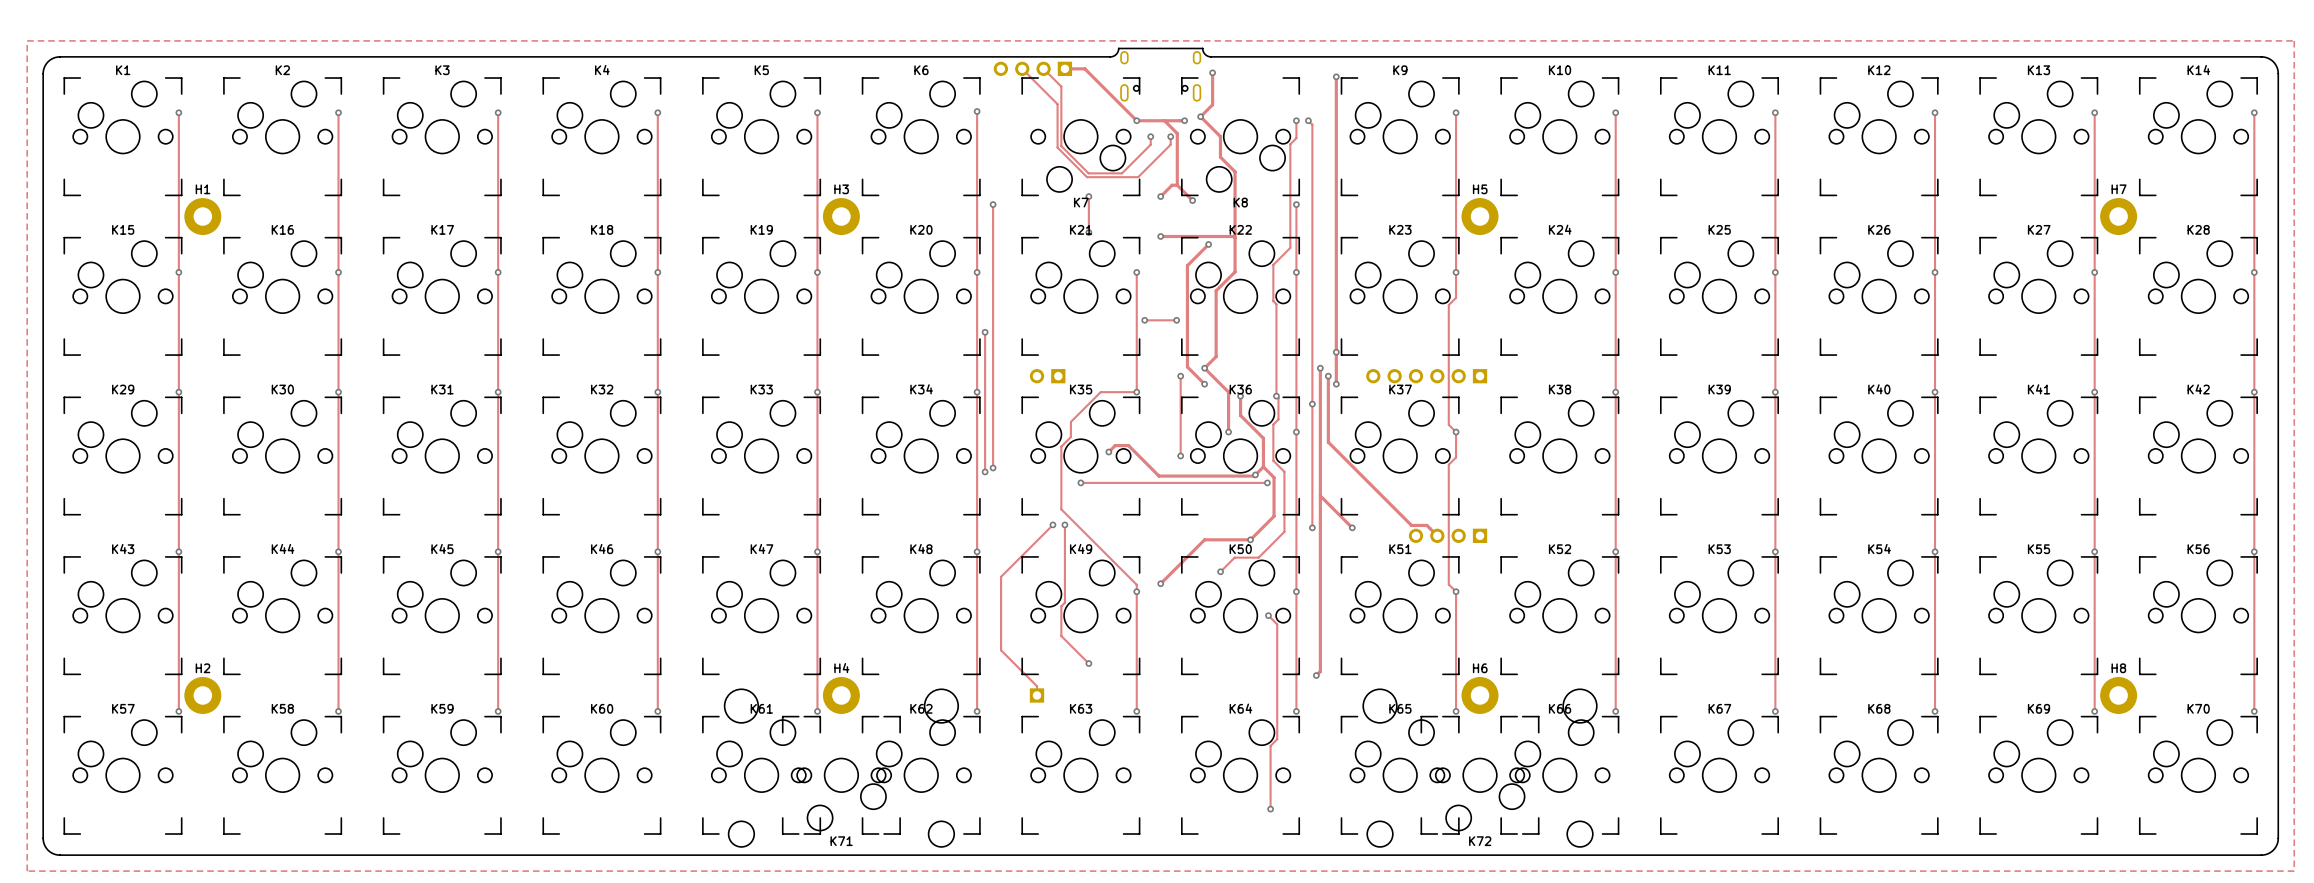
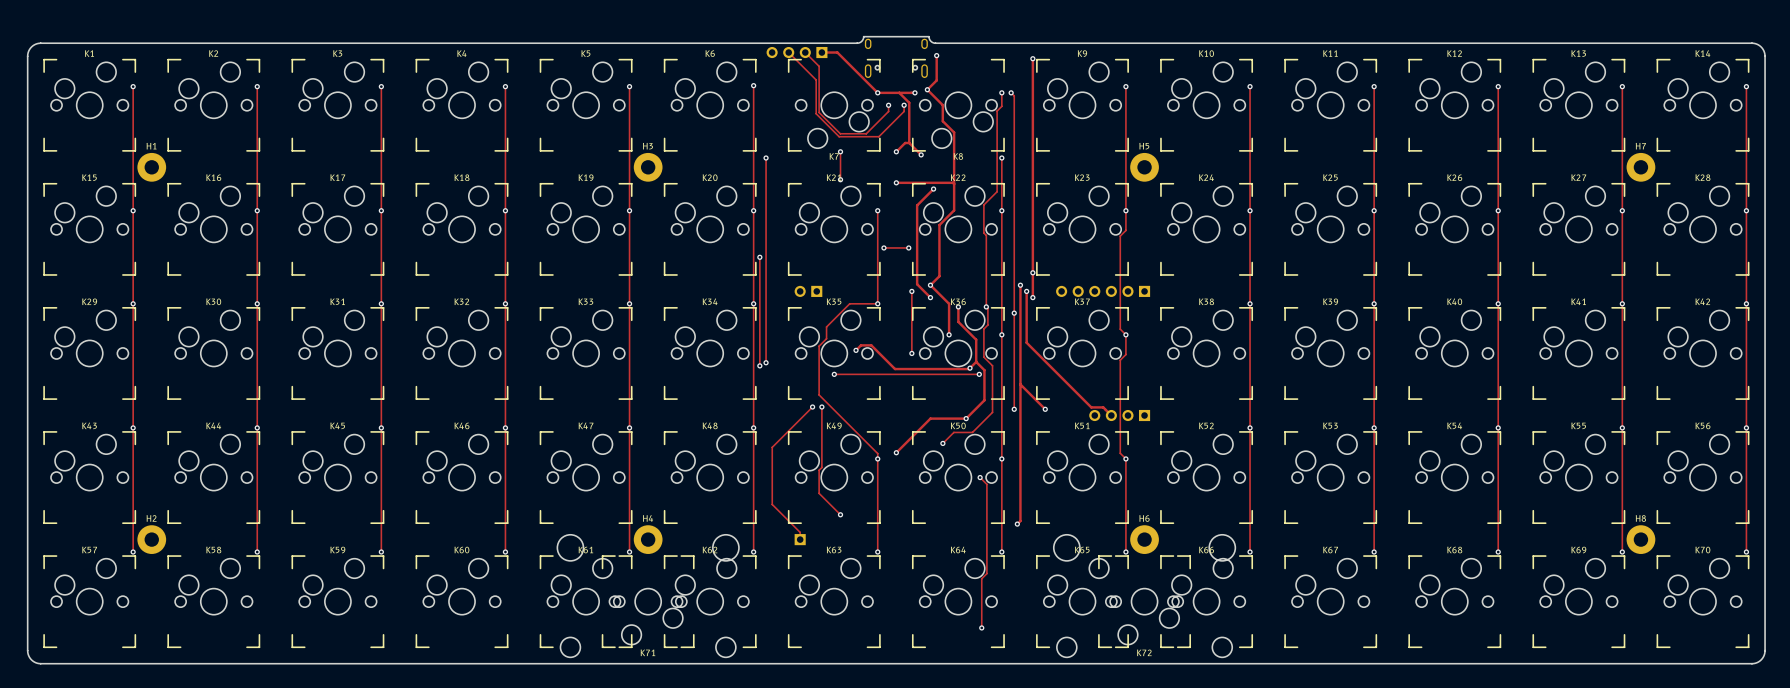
zone outline: (27, 40) (2294, 40) (2294, 871) (27, 871) (27, 40) -> none

